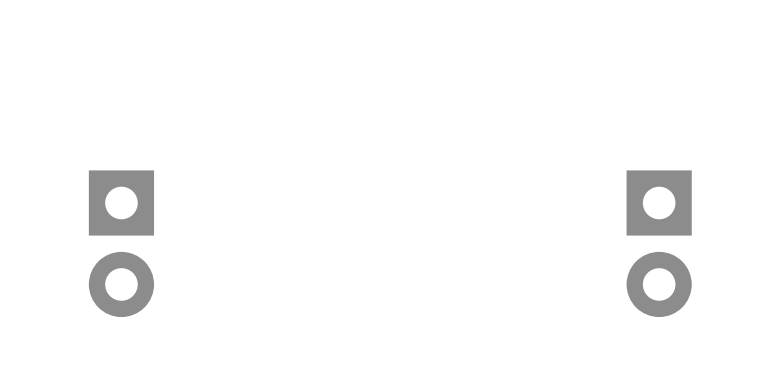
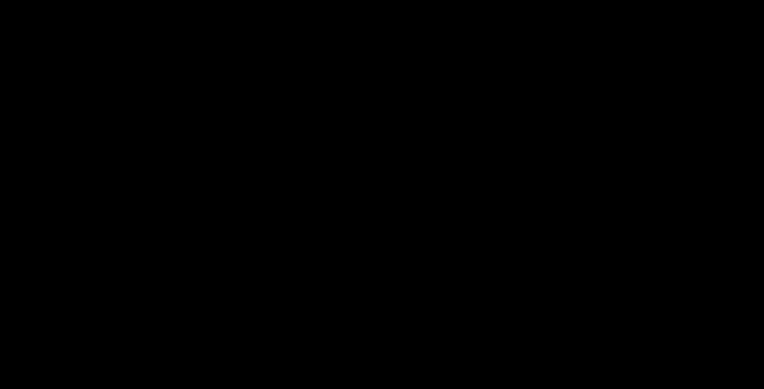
part: (121, 243) -> none
part: (659, 243) -> none

